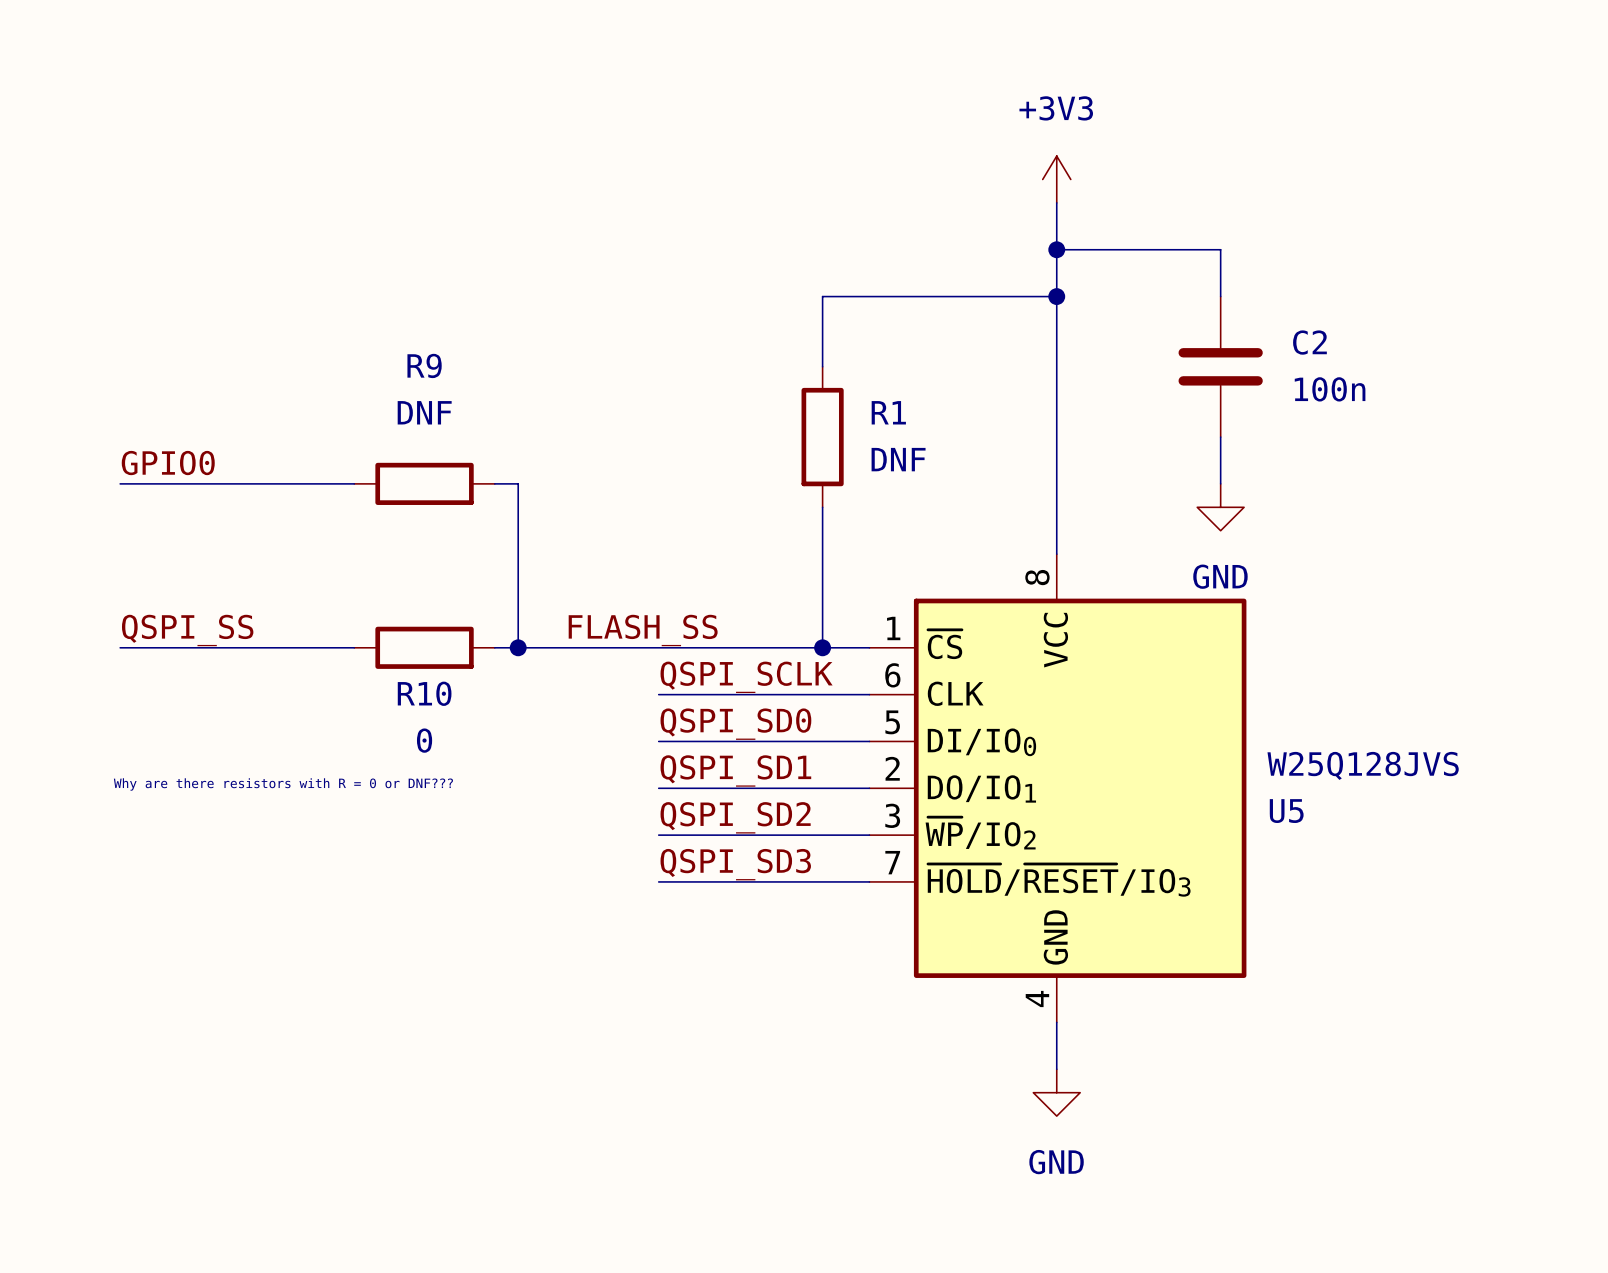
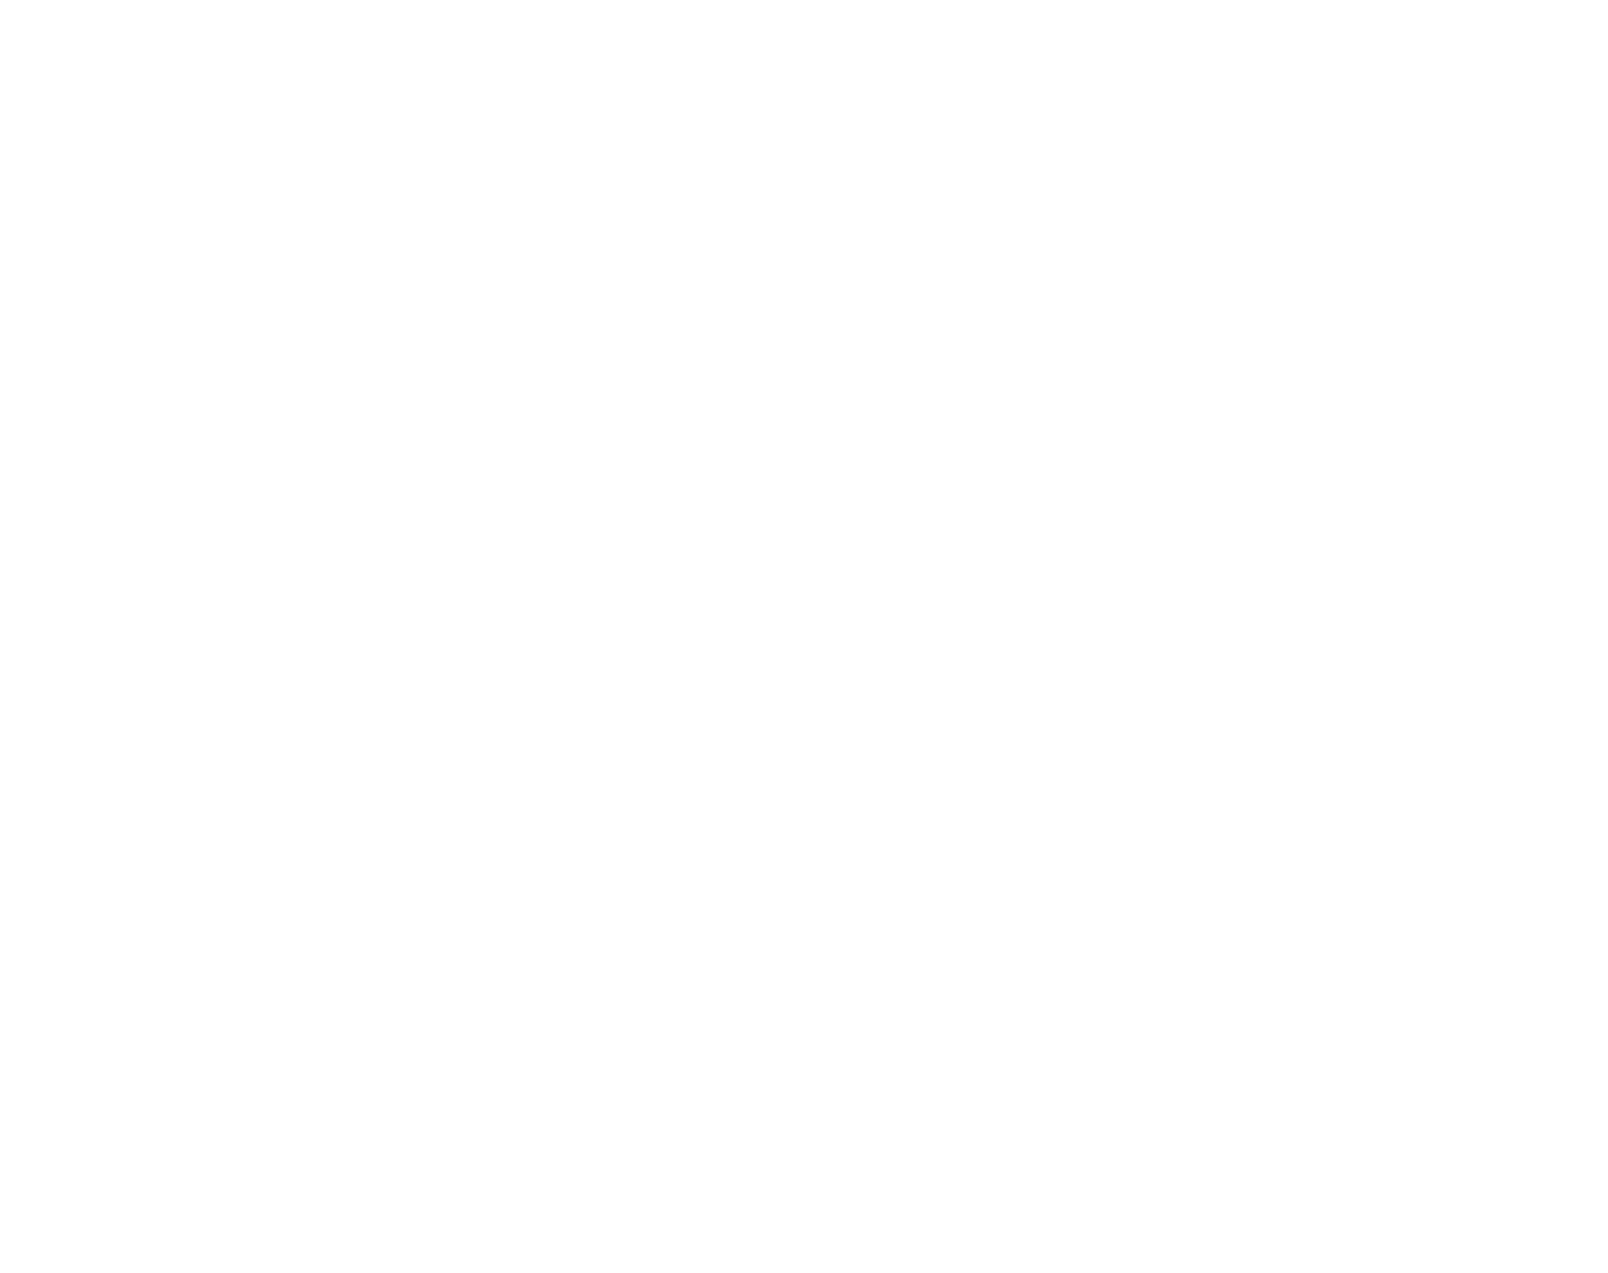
power symbol: +3V3 (1056, 179) -> none
wire: (1056, 202) (1056, 554) -> none
wire: (1056, 249) (1220, 249) (1220, 296) -> none
junction: (1056, 249) -> none
wire: (1056, 296) (822, 296) (822, 366) -> none
junction: (1056, 296) -> none
C2: 100n (1220, 366) -> none
R1: DNF (822, 437) -> none
wire: (1220, 437) (1220, 483) -> none
label: GPIO0 (168, 463) -> none
wire: (120, 483) (354, 483) -> none
R9: DNF (424, 483) -> none
wire: (494, 483) (518, 483) (518, 647) -> none
wire: (822, 507) (822, 647) -> none
power symbol: GND (1220, 507) -> none
label: QSPI_SS (187, 630) -> none
label: FLASH_SS (643, 630) -> none
wire: (120, 647) (354, 647) -> none
R10: 0 (424, 647) -> none
wire: (494, 647) (869, 647) -> none
junction: (518, 647) -> none
junction: (822, 647) -> none
label: QSPI_SCLK (746, 677) -> none
wire: (658, 694) (869, 694) -> none
label: QSPI_SD0 (735, 724) -> none
wire: (658, 741) (869, 741) -> none
label: QSPI_SD1 (735, 770) -> none
text: Why are there resistors with R = 0 or DNF??? (283, 784) -> none
wire: (658, 788) (869, 788) -> none
U5: W25Q128JVS (1057, 788) -> none
label: QSPI_SD2 (735, 817) -> none
wire: (658, 835) (869, 835) -> none
label: QSPI_SD3 (735, 864) -> none
wire: (658, 881) (869, 881) -> none
wire: (1056, 1022) (1056, 1069) -> none
power symbol: GND (1056, 1092) -> none

